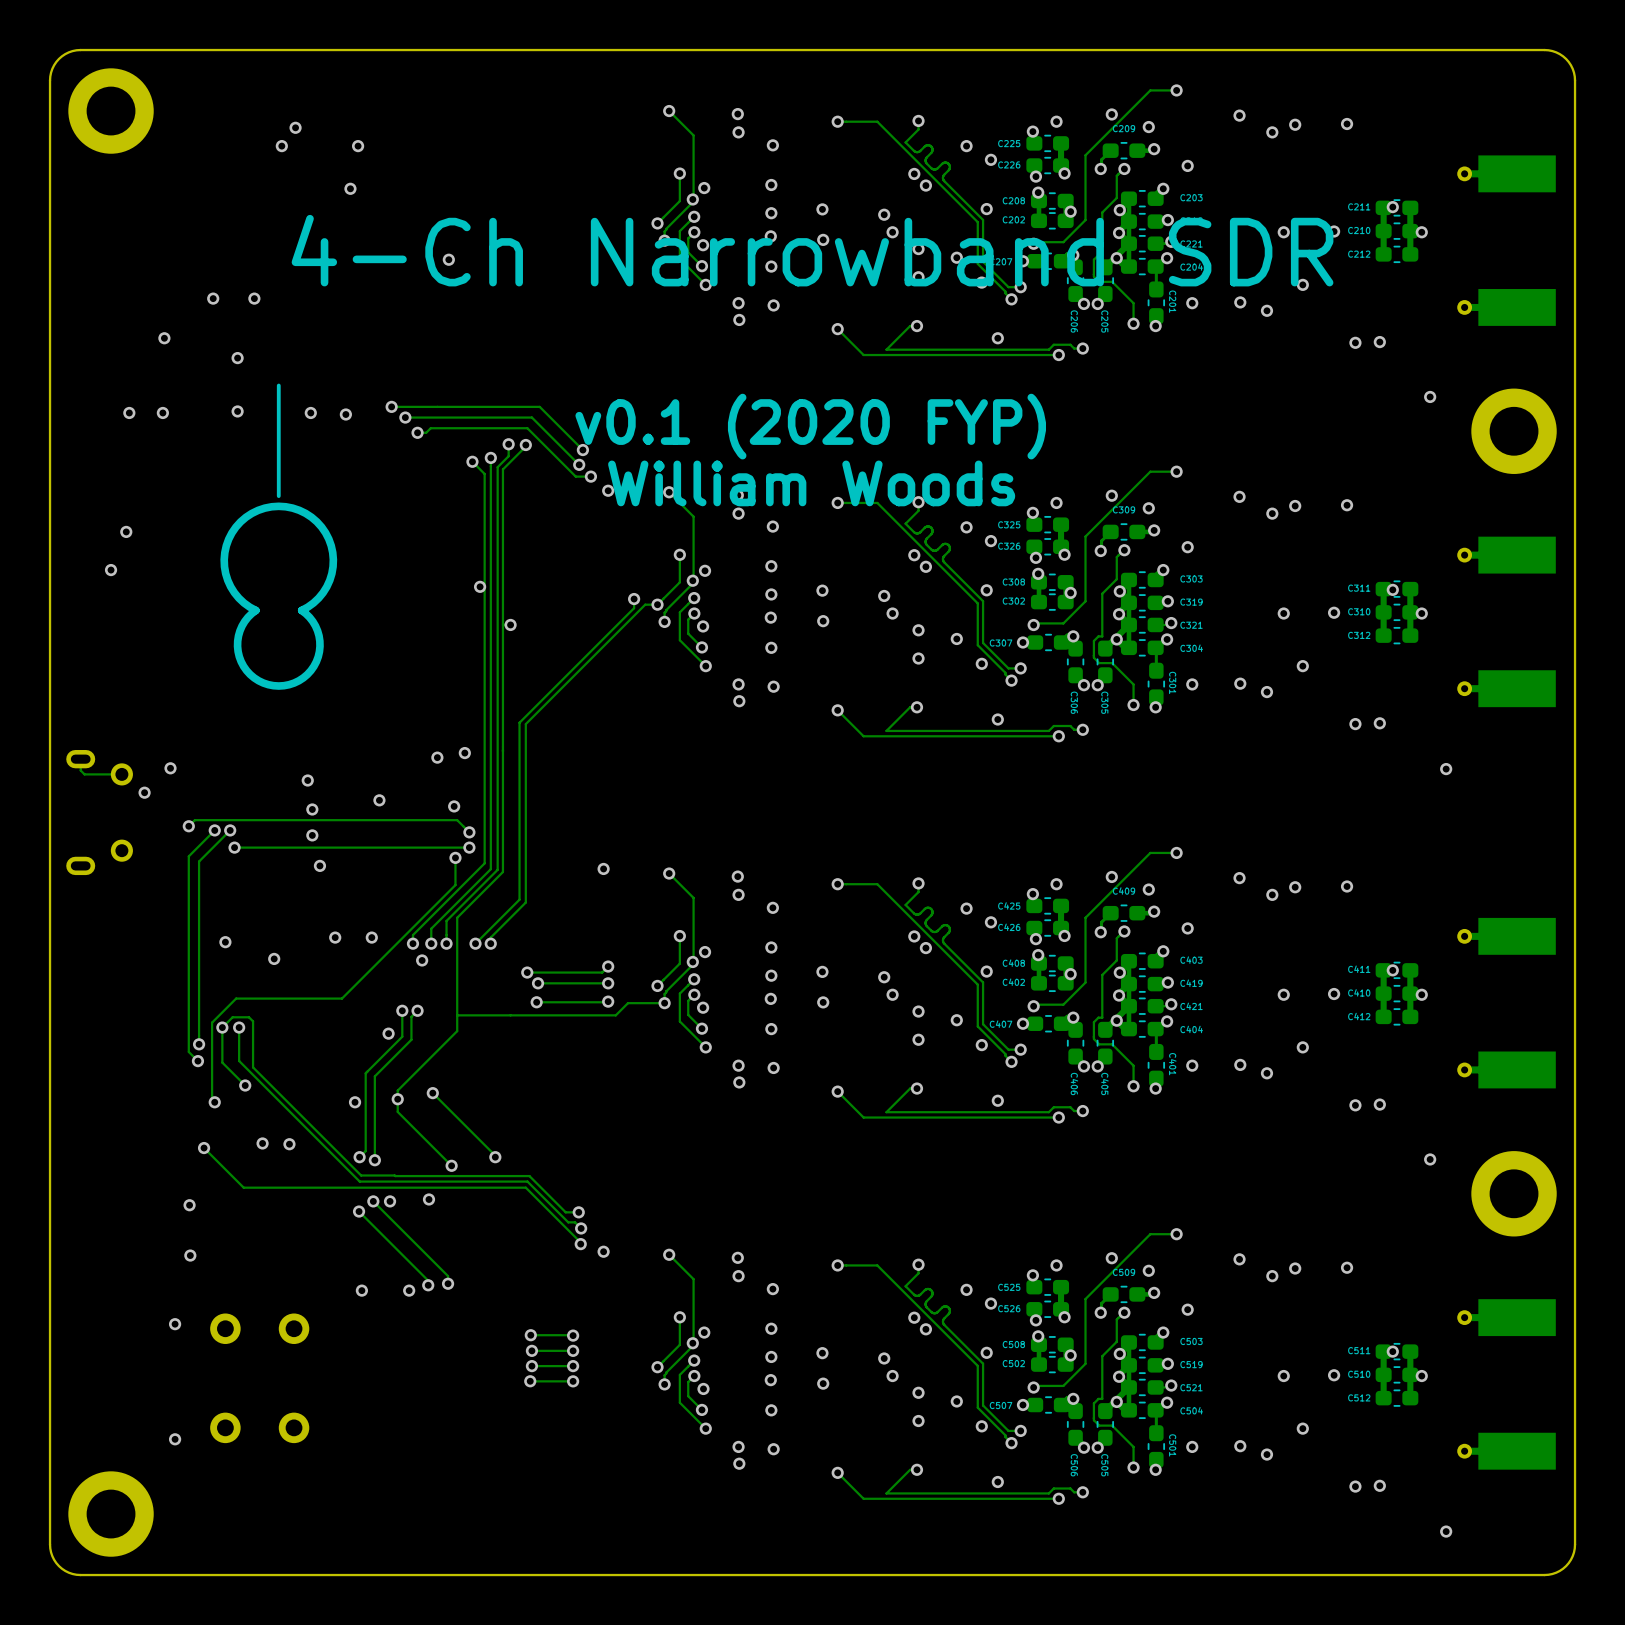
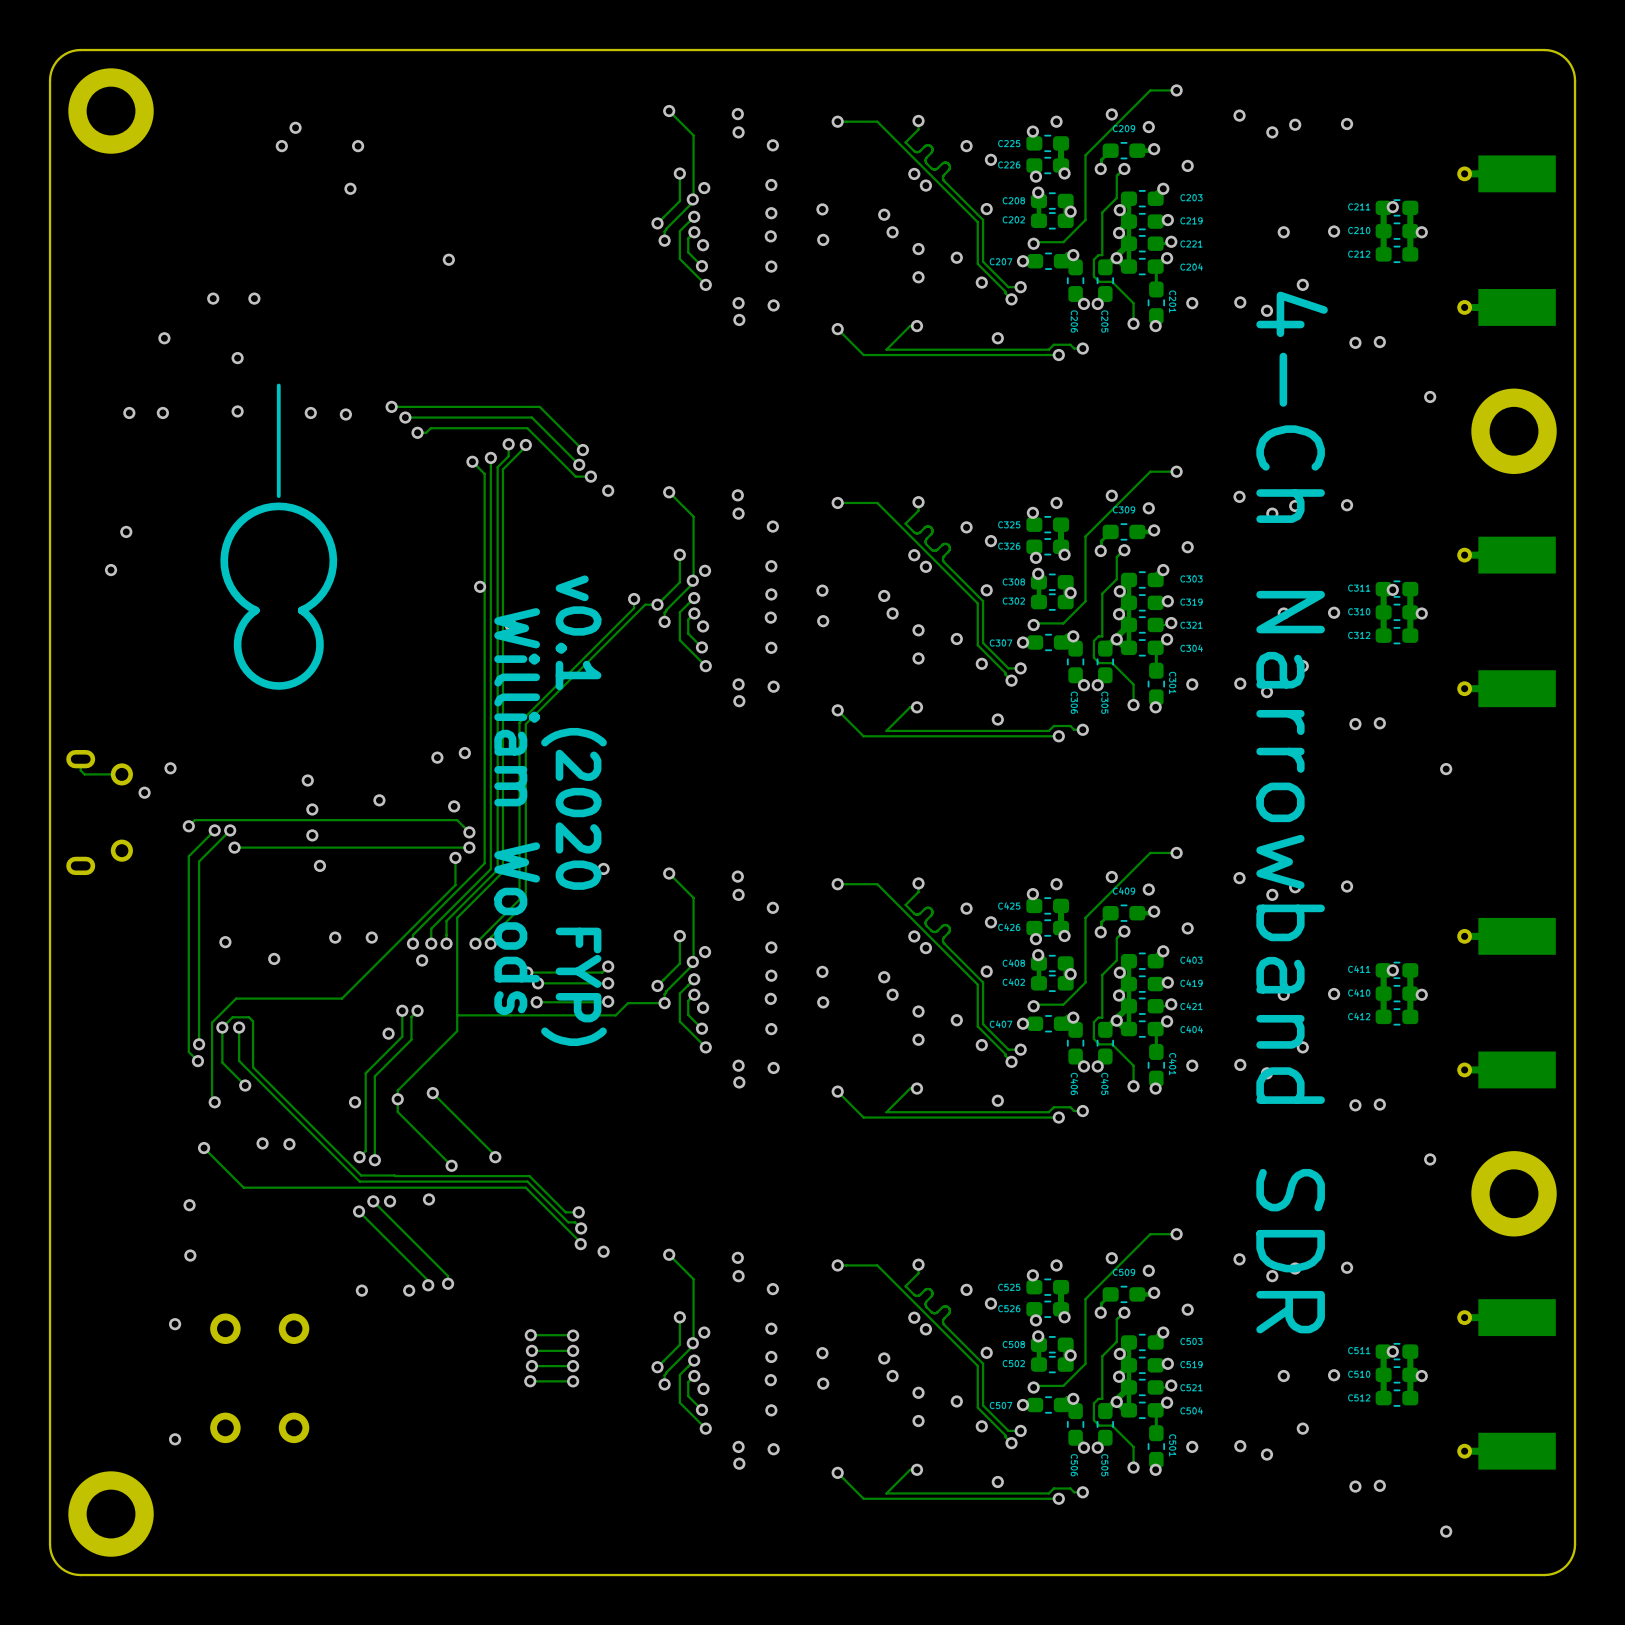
text: 4-Ch Narrowband SDR (812, 250) -> none
text: v0.1 (2020 FYP) (810, 426) -> none
text: William Woods (811, 483) -> none
text: none -> v0.1 (2020 FYP) (573, 810)
text: none -> William Woods (517, 811)
text: none -> 4-Ch Narrowband SDR (1292, 812)

